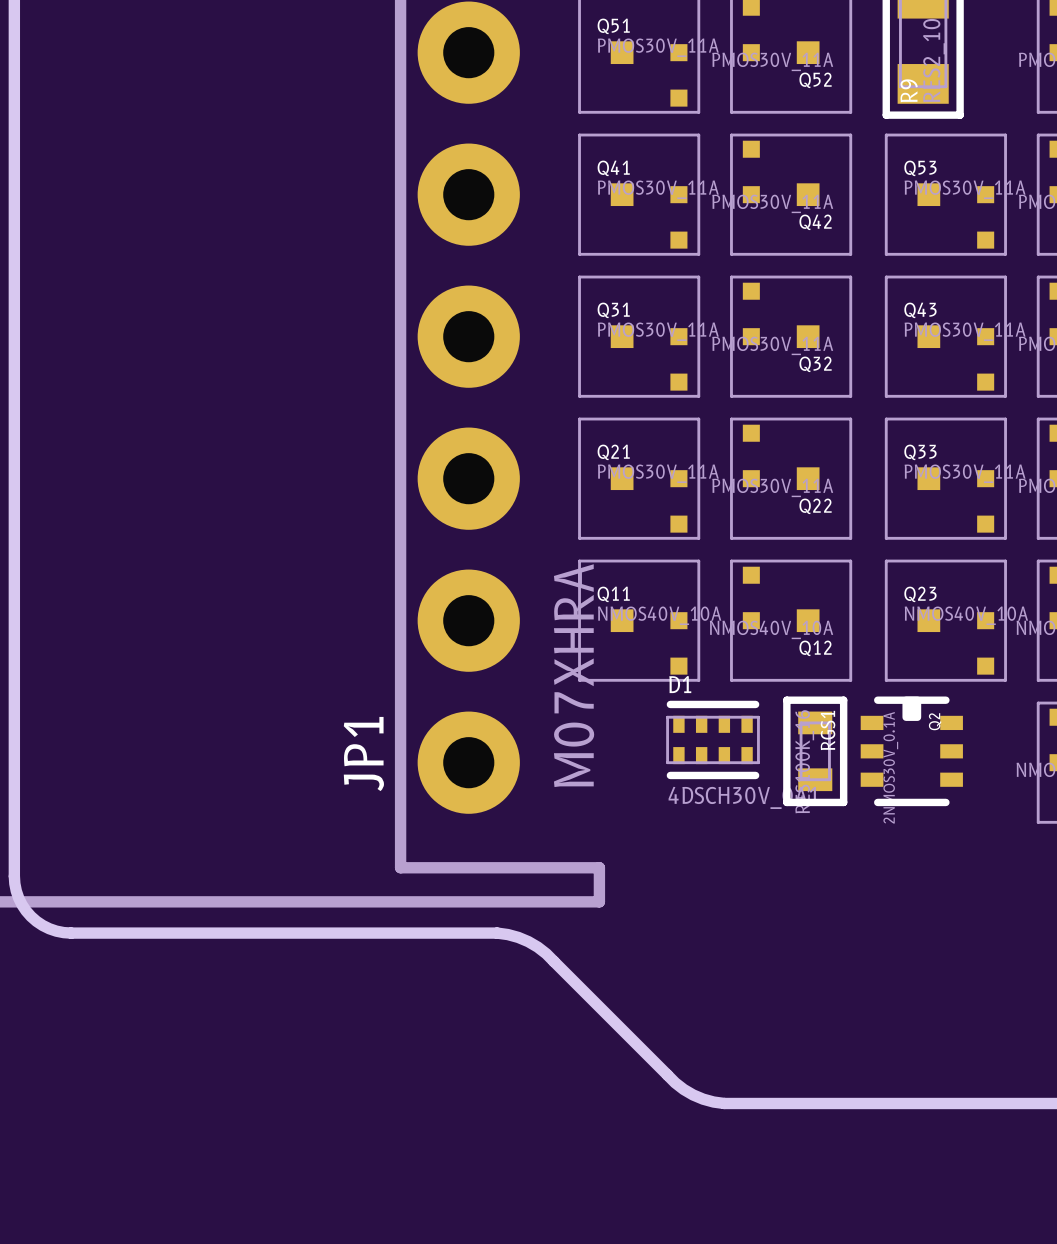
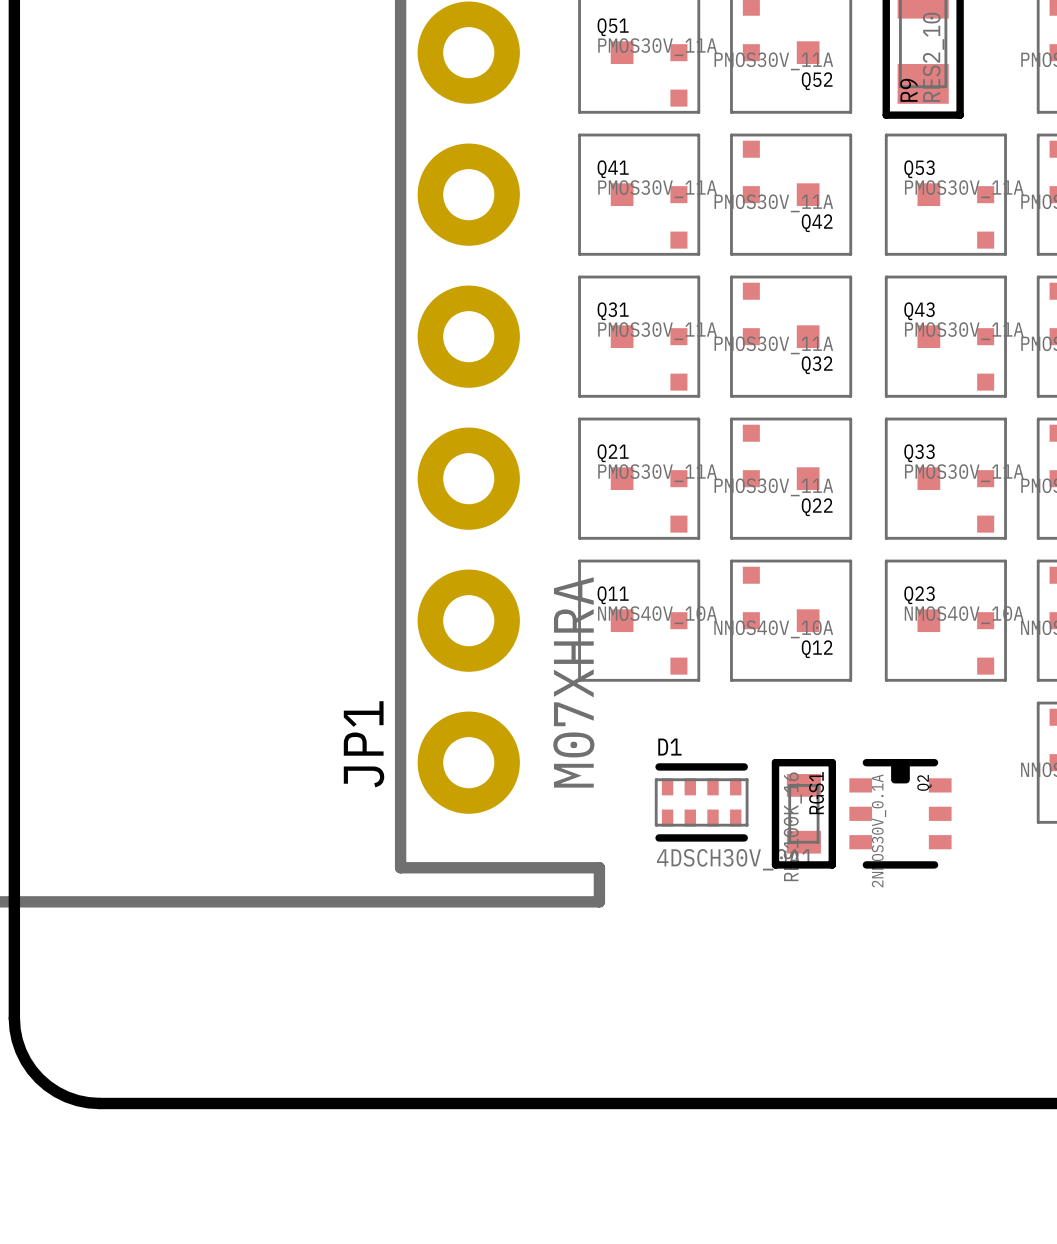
D1 position: (713, 739) -> (701, 802)
RGS1 position: (815, 751) -> (803, 813)
Q2 position: (911, 751) -> (900, 813)
board edge: (14, 876) (18, 898) (26, 910) (42, 925) (63, 932) (497, 933) (518, 937) (546, 953) (675, 1082) (693, 1094) (724, 1103) -> (14, 876) (14, 1018) (17, 1040) (25, 1060) (39, 1078) (56, 1092) (77, 1100) (99, 1103) (724, 1103)

